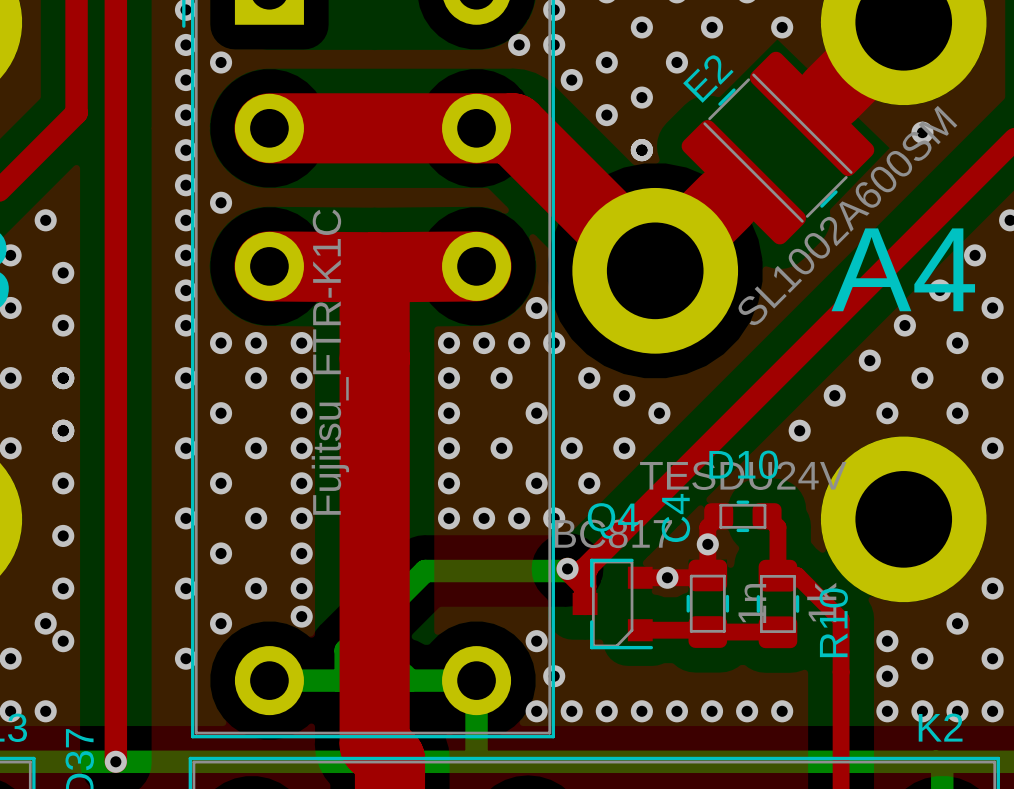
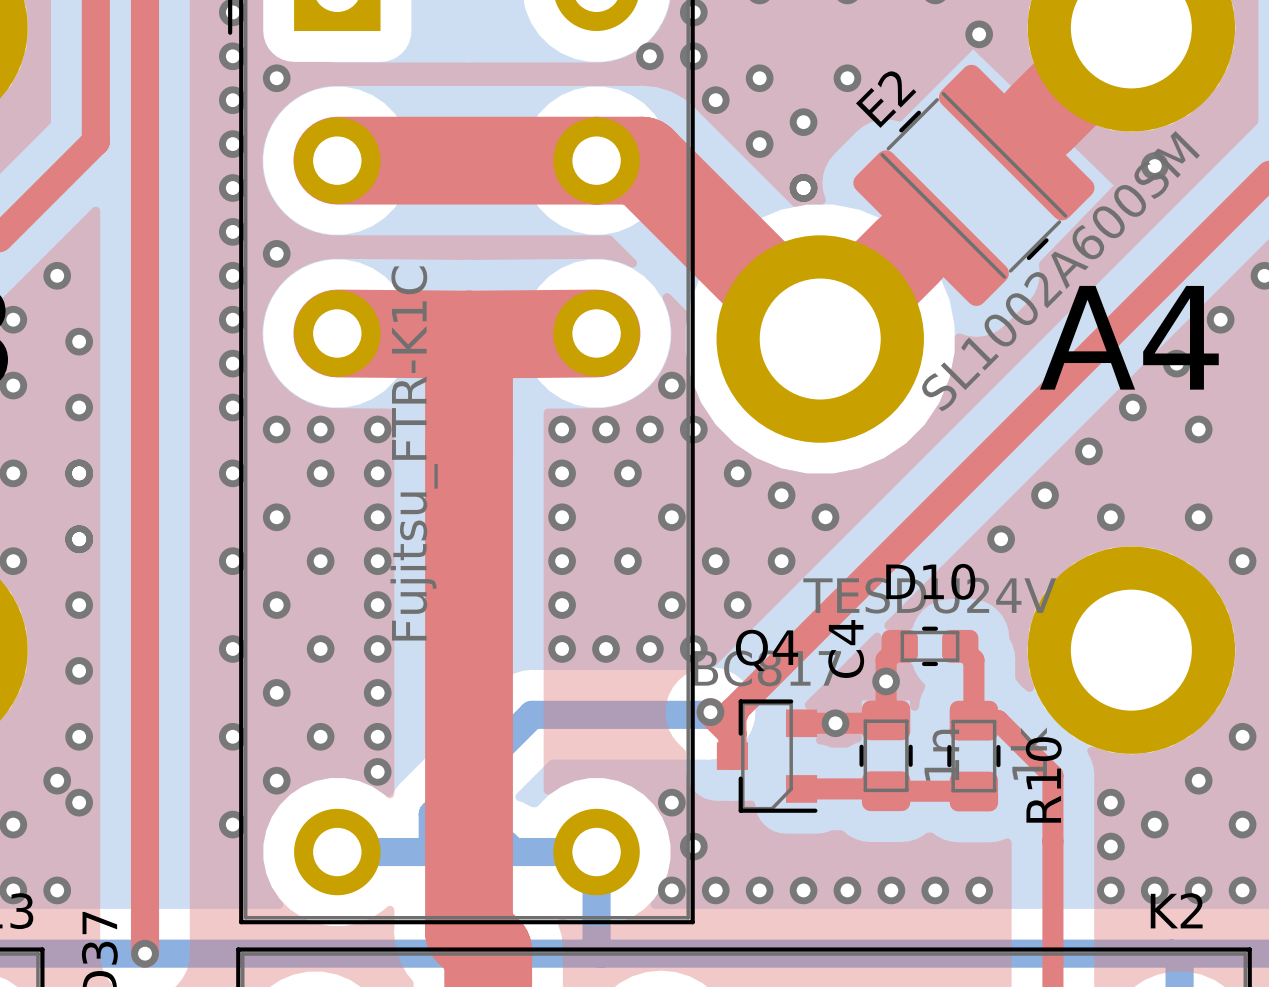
via: (641, 27) -> none
via: (712, 27) -> none
via: (992, 307) -> none
via: (922, 378) -> none
via: (992, 378) -> none

